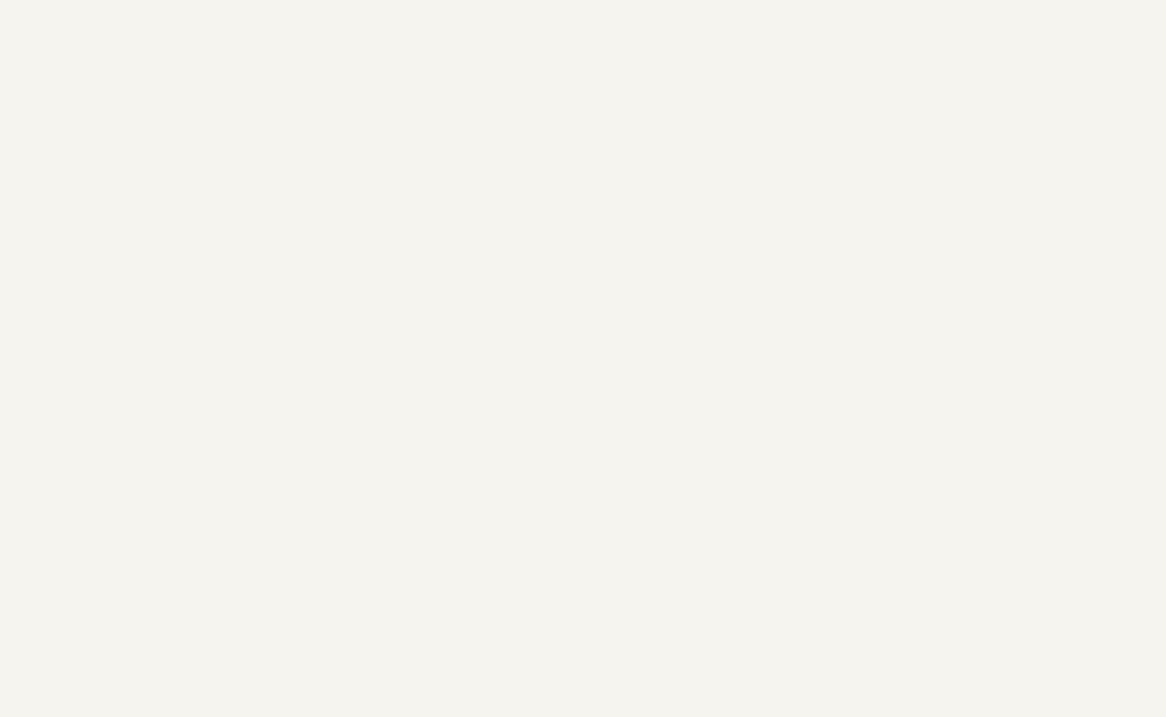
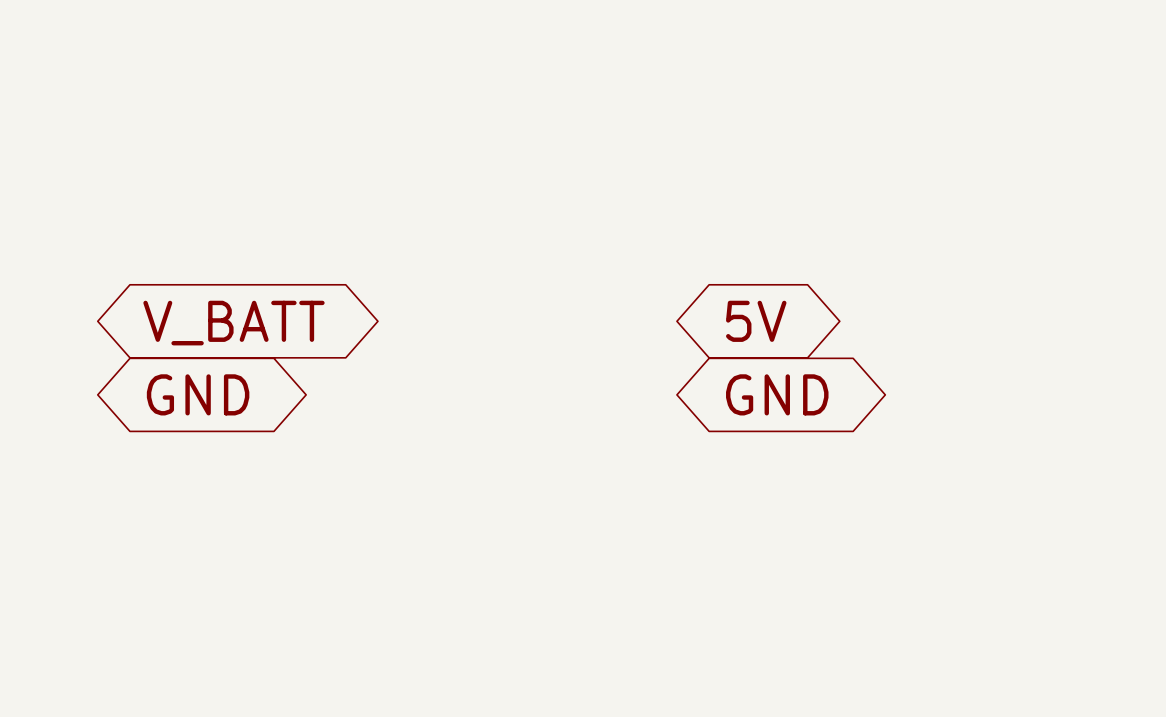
global label: none -> 5V (756, 321)
global label: none -> V_BATT (233, 323)
global label: none -> GND (198, 394)
global label: none -> GND (777, 394)

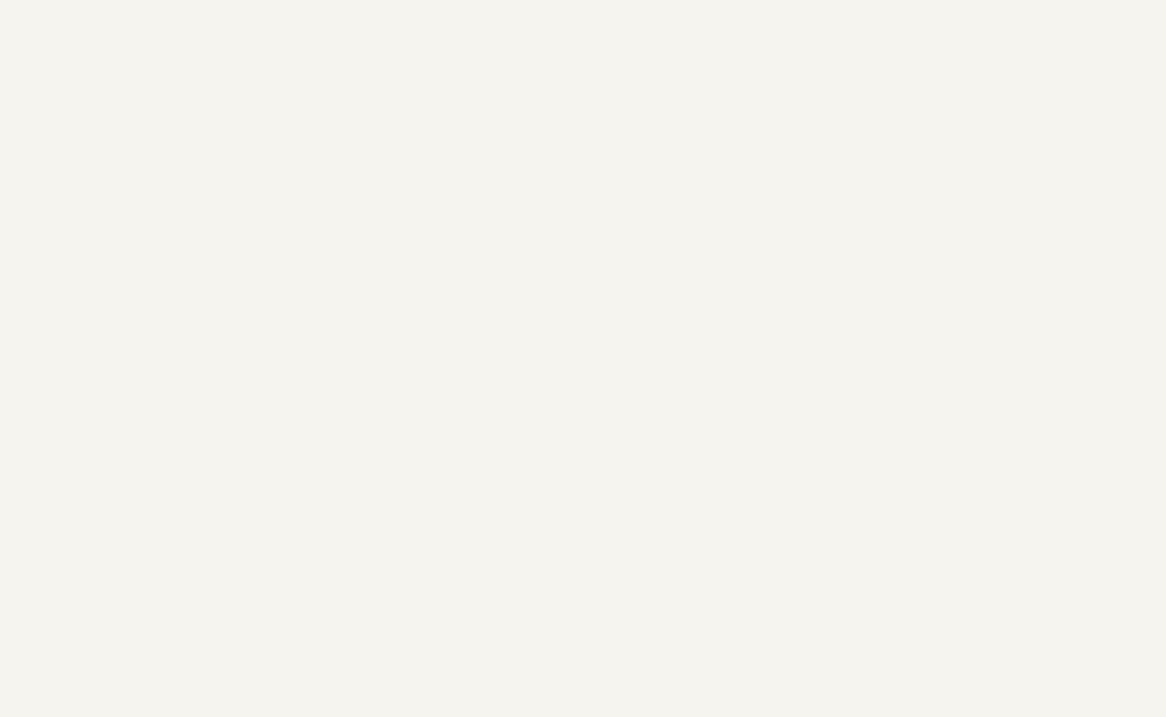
global label: 5V (756, 321) -> none
global label: V_BATT (233, 323) -> none
global label: GND (198, 394) -> none
global label: GND (777, 394) -> none

